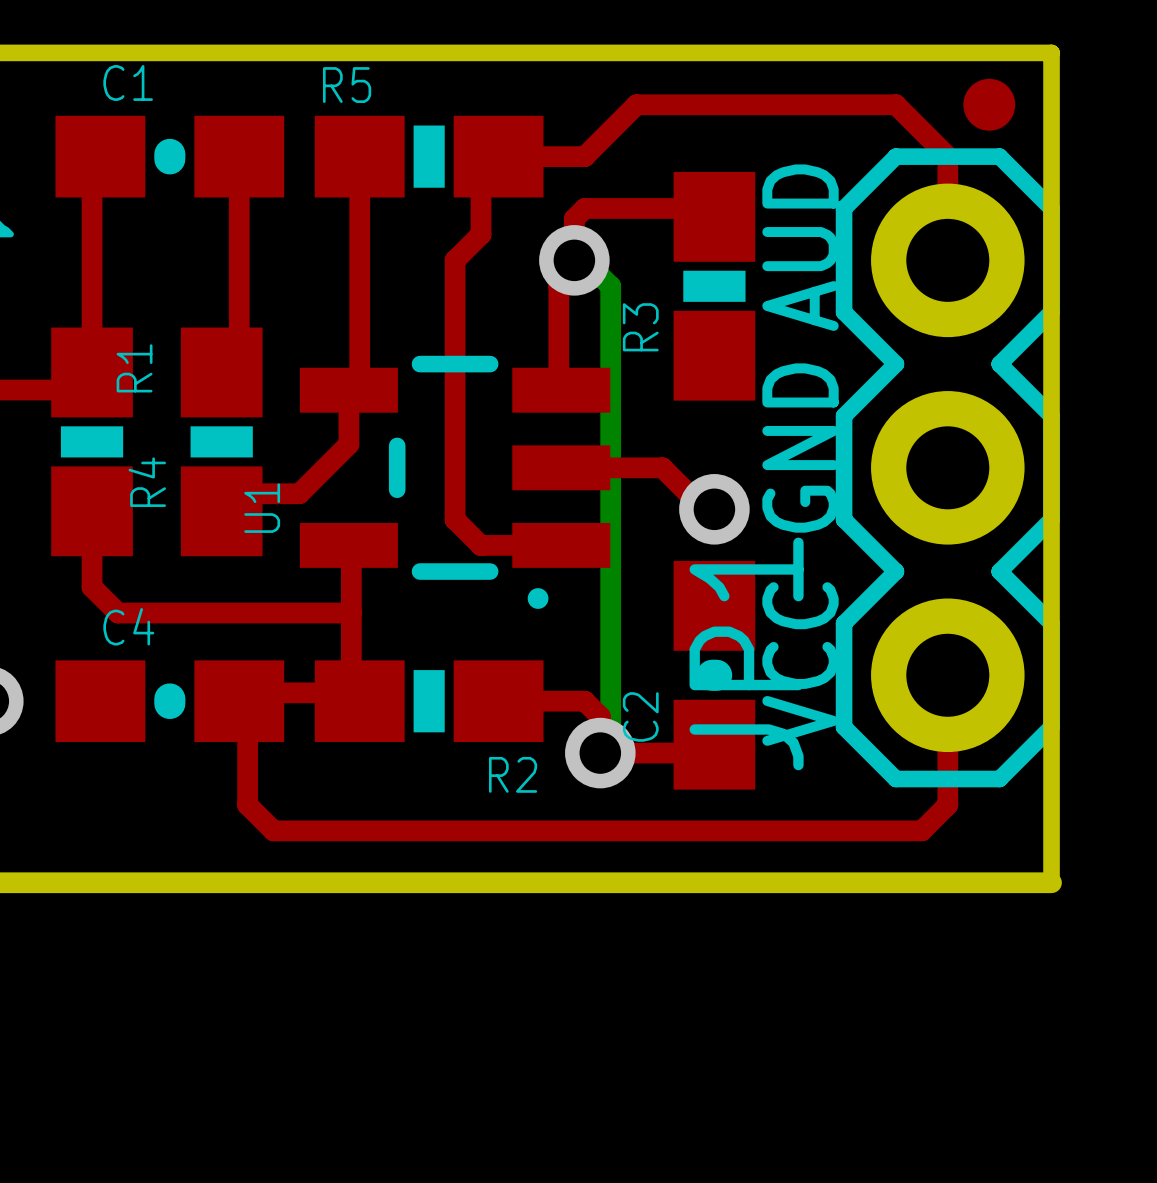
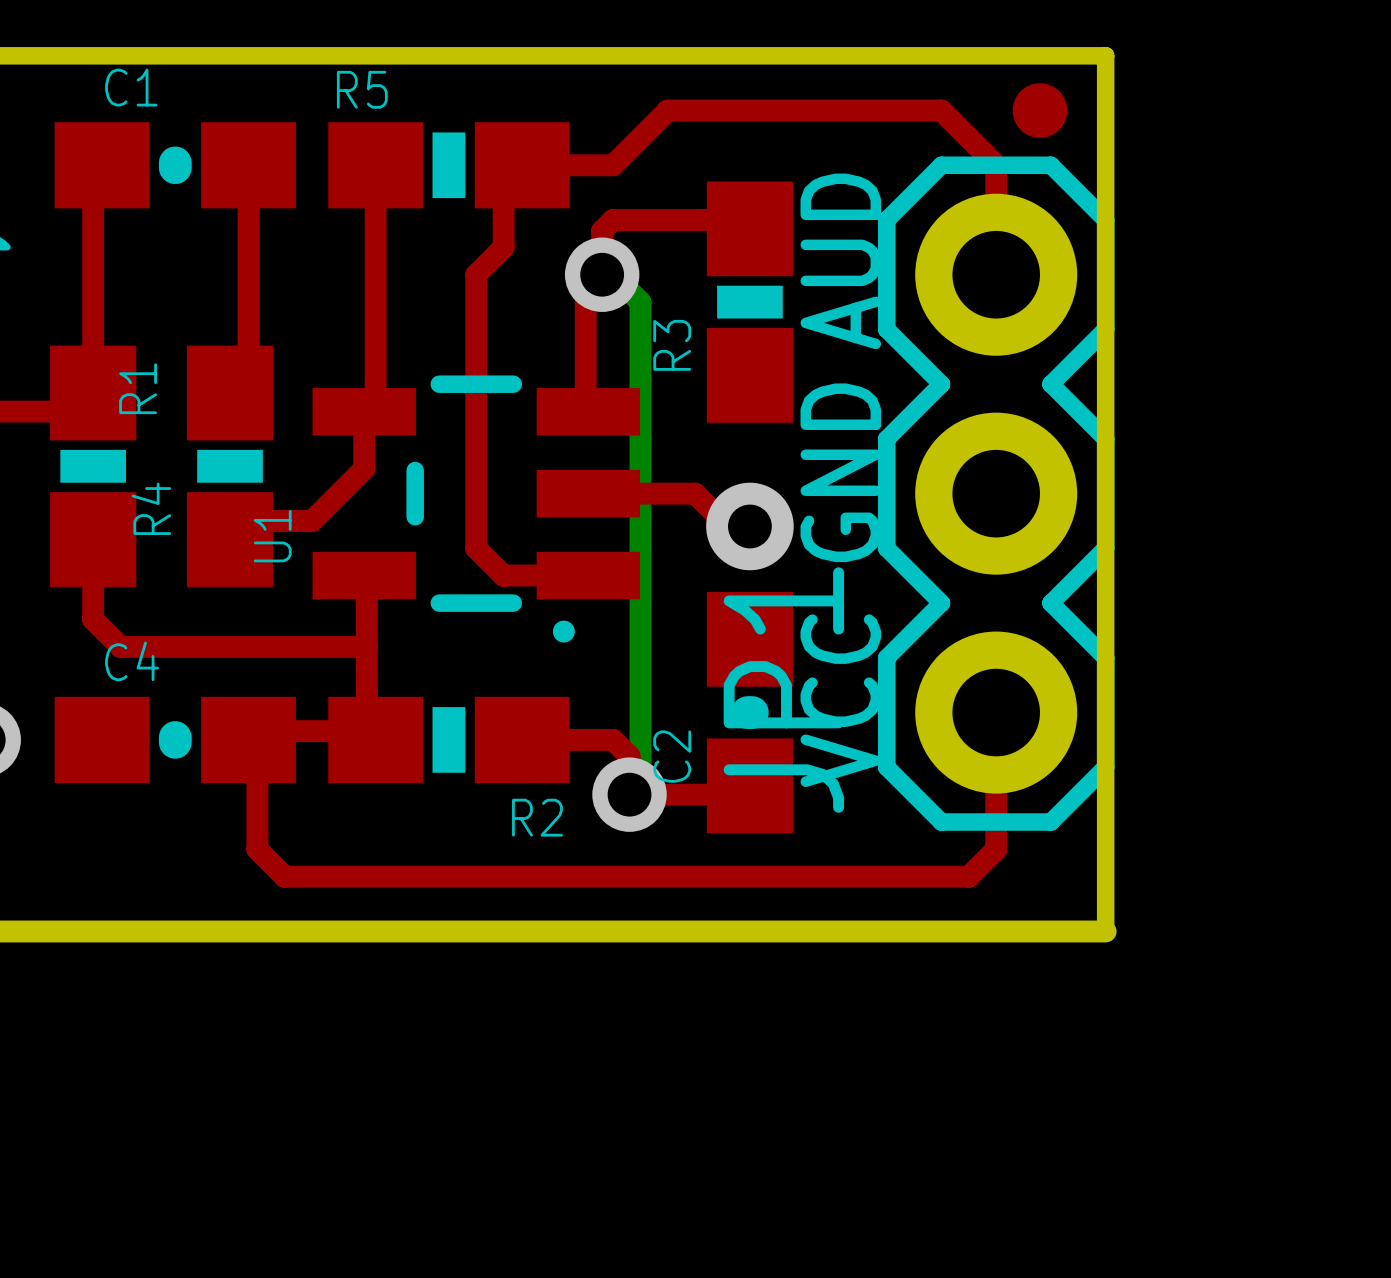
via size: [679, 474, 750, 545] -> [706, 482, 794, 571]

